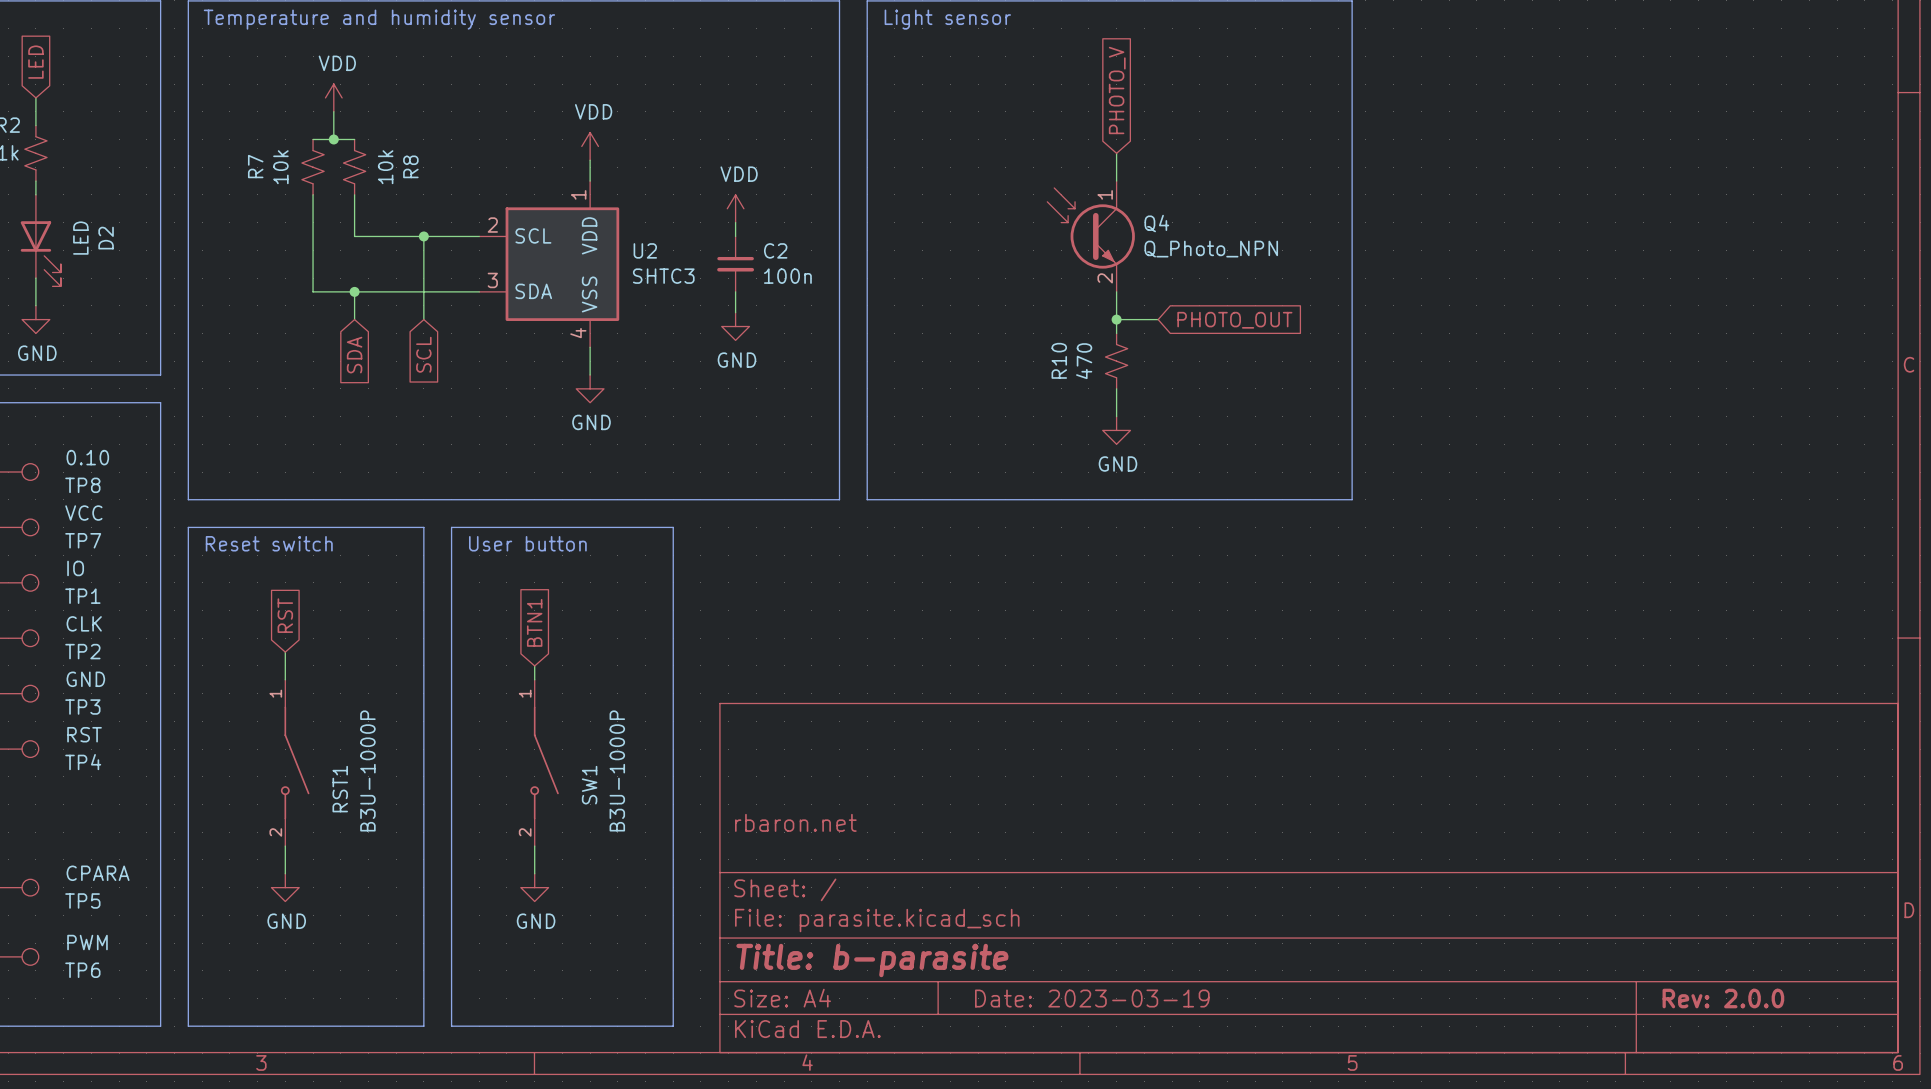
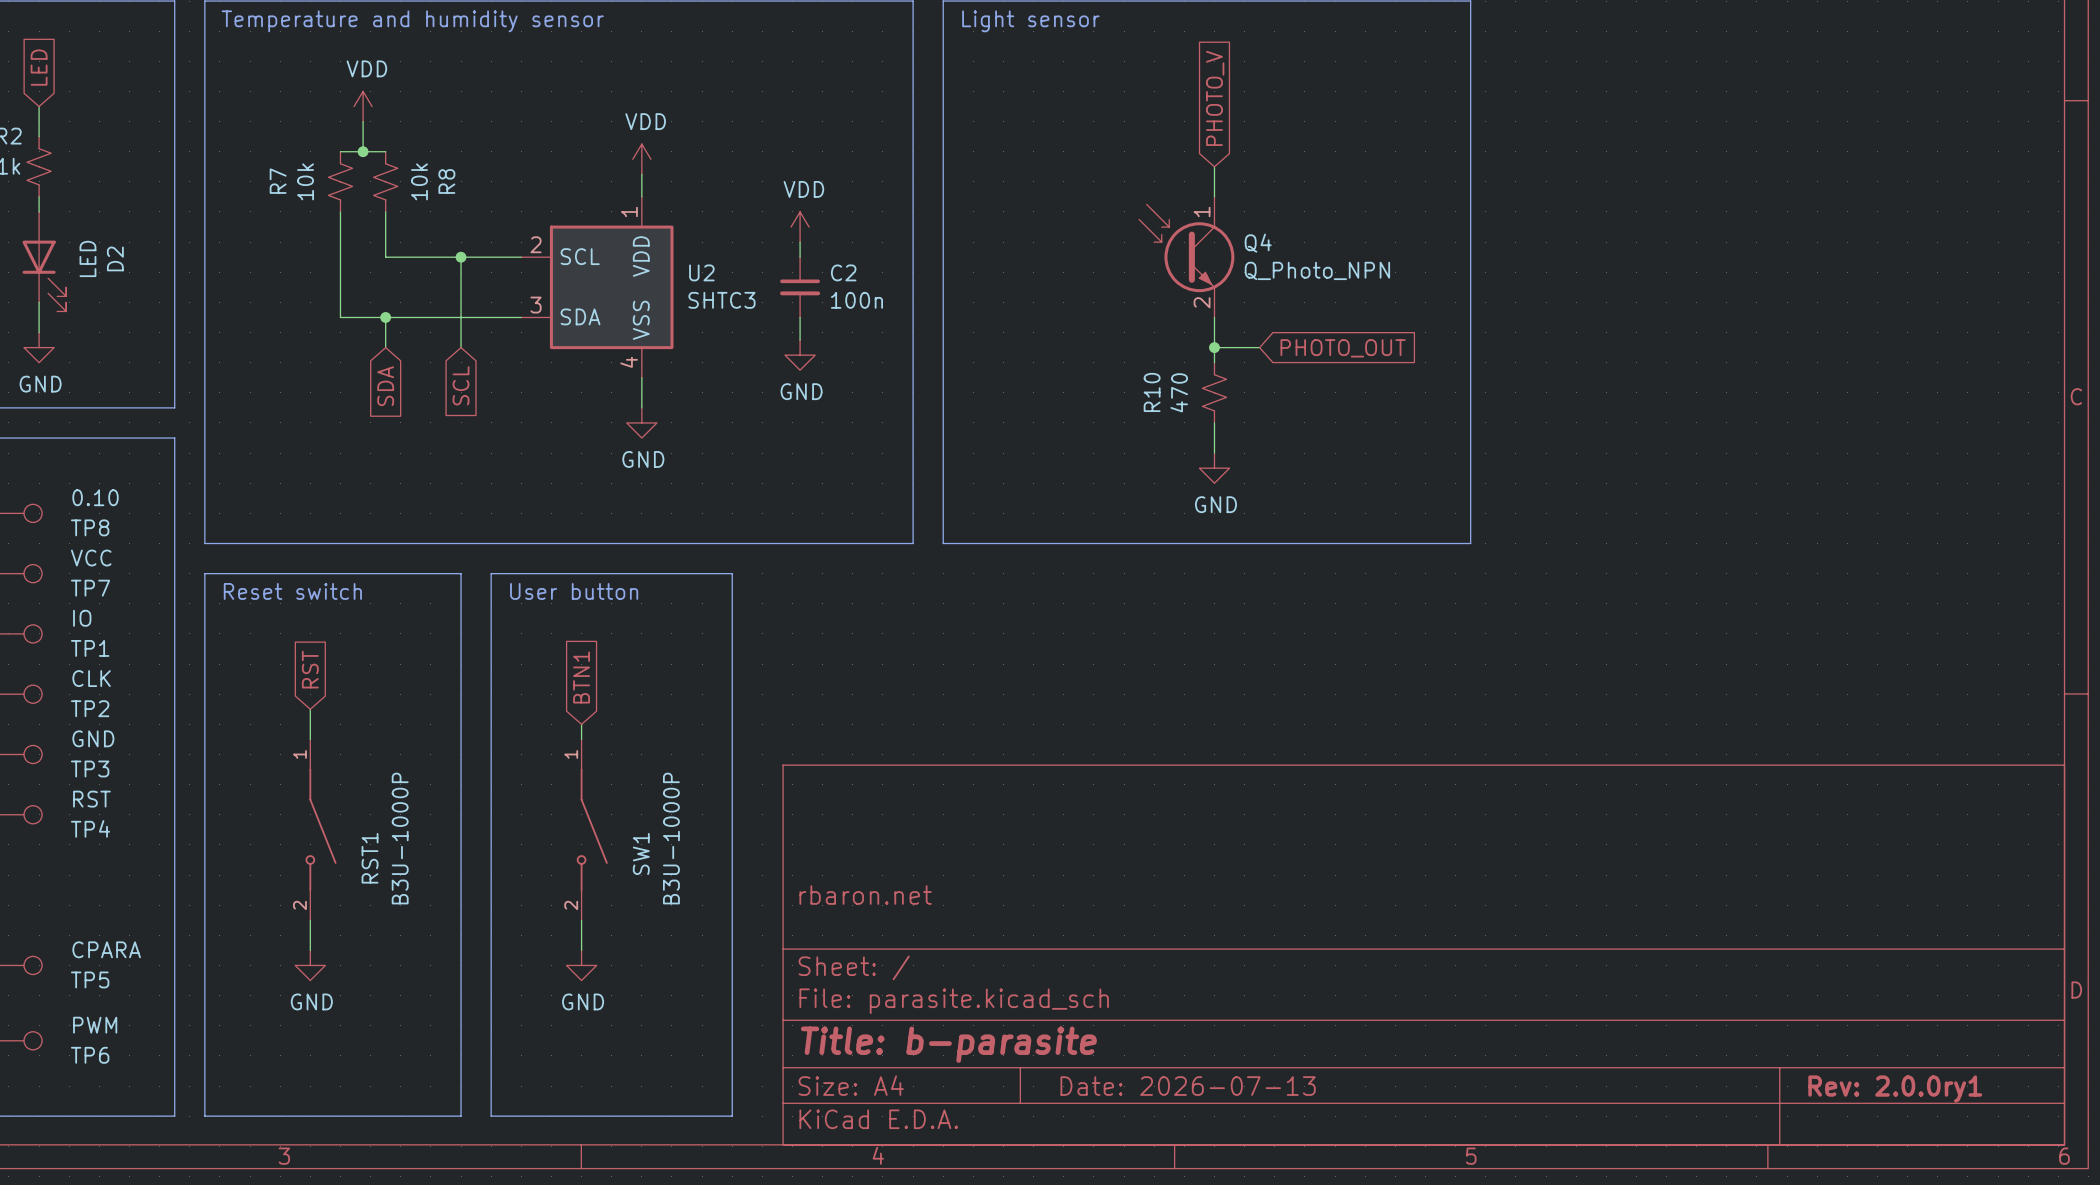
title block: Date: 2023-03-19 (1092, 998) -> Date: 2026-07-13 (1188, 1086)
title block: Rev: 2.0.0 (1723, 998) -> Rev: 2.0.0ry1 (1895, 1089)

